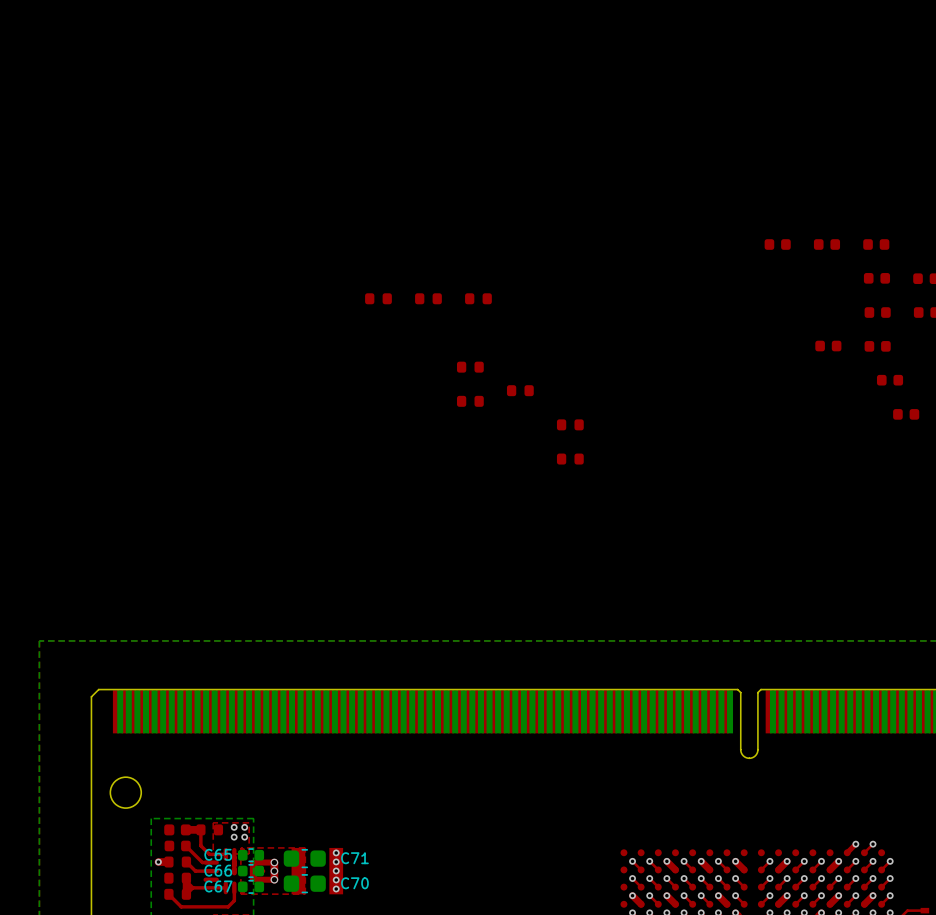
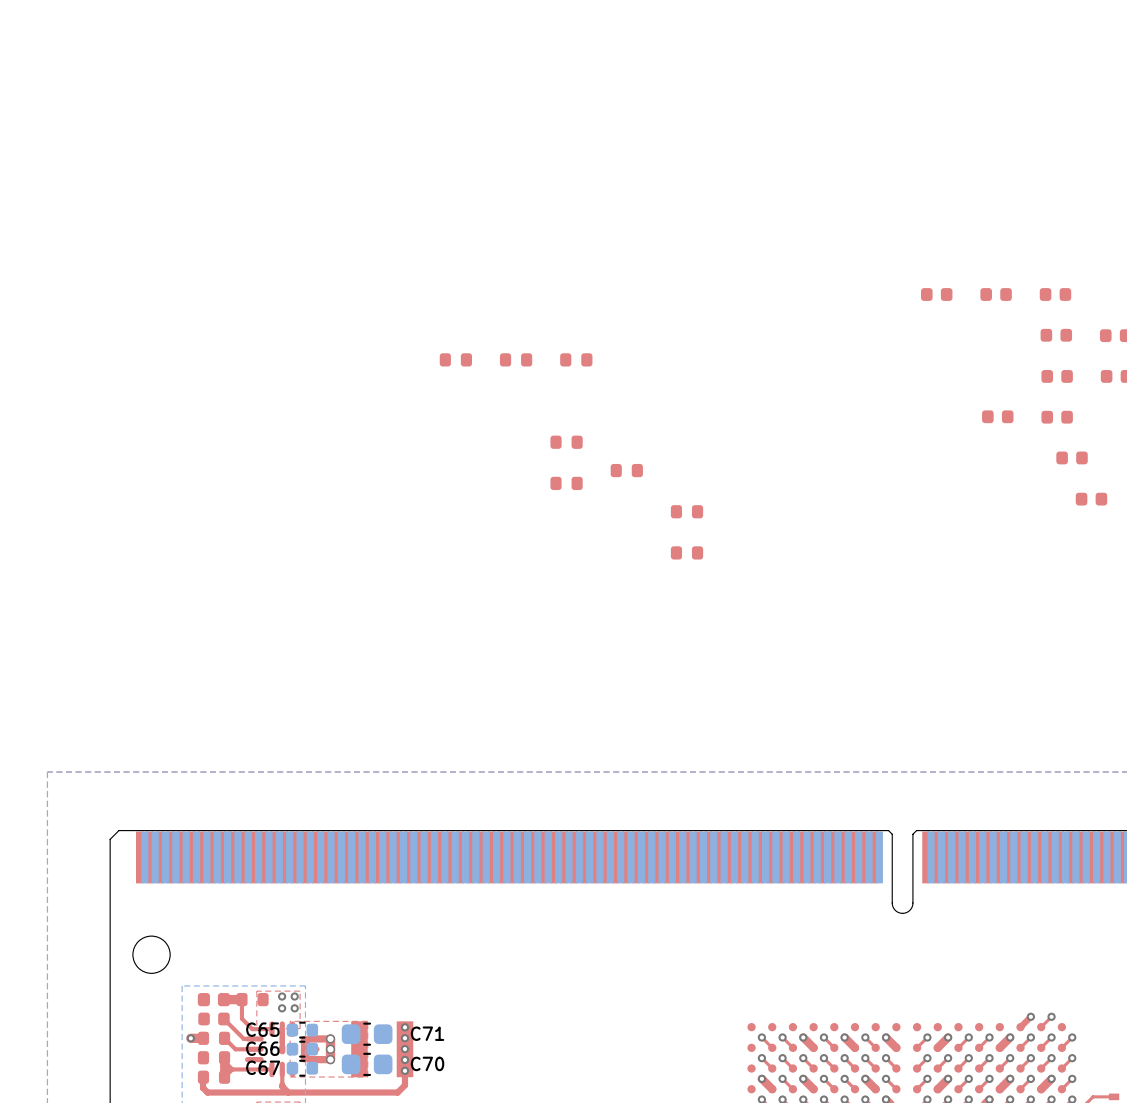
top track: none -> (404, 1070) (404, 1085) (397, 1092) (207, 1092) (203, 1087) (203, 1077)
top track: (168, 894) (181, 906) (228, 906) (234, 900) -> (288, 1092) (282, 1084)

